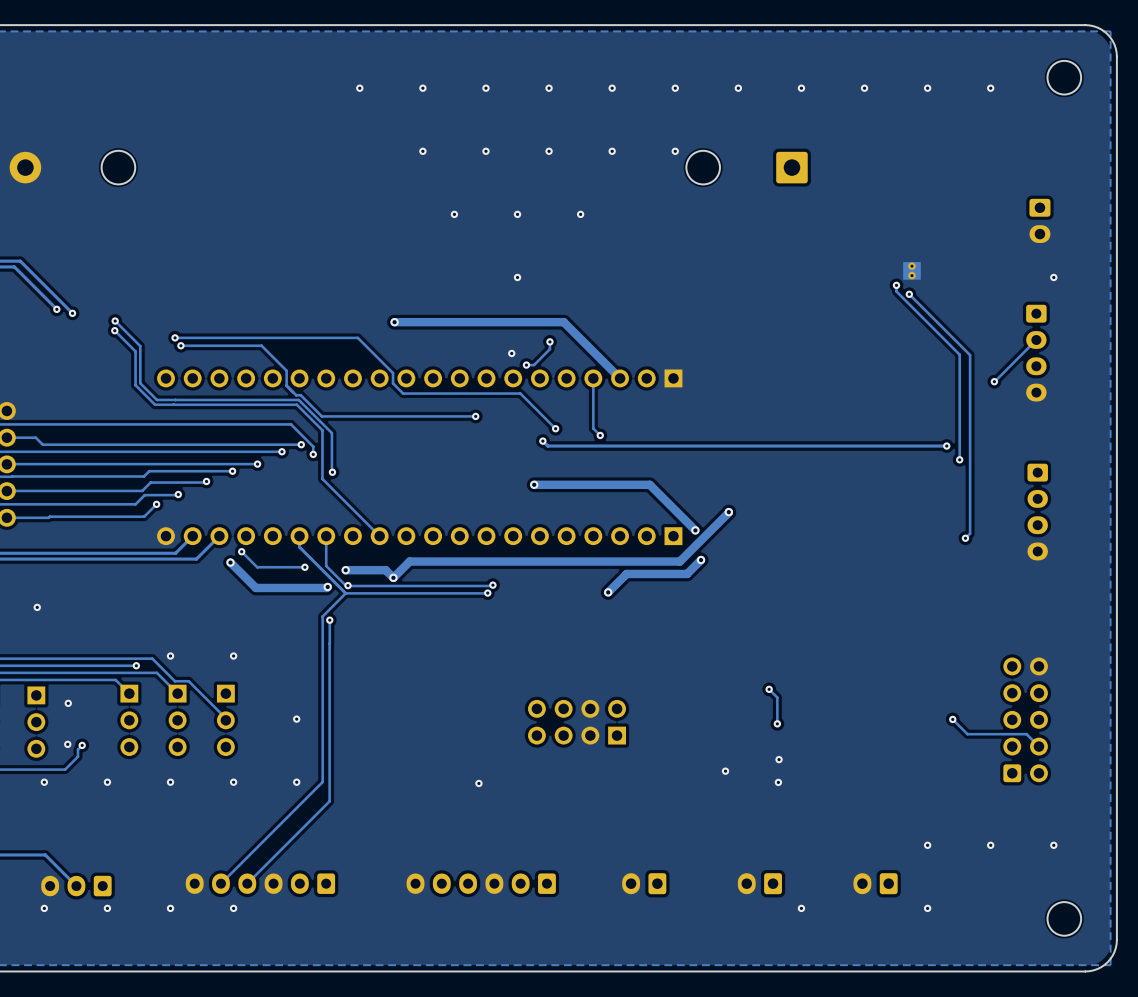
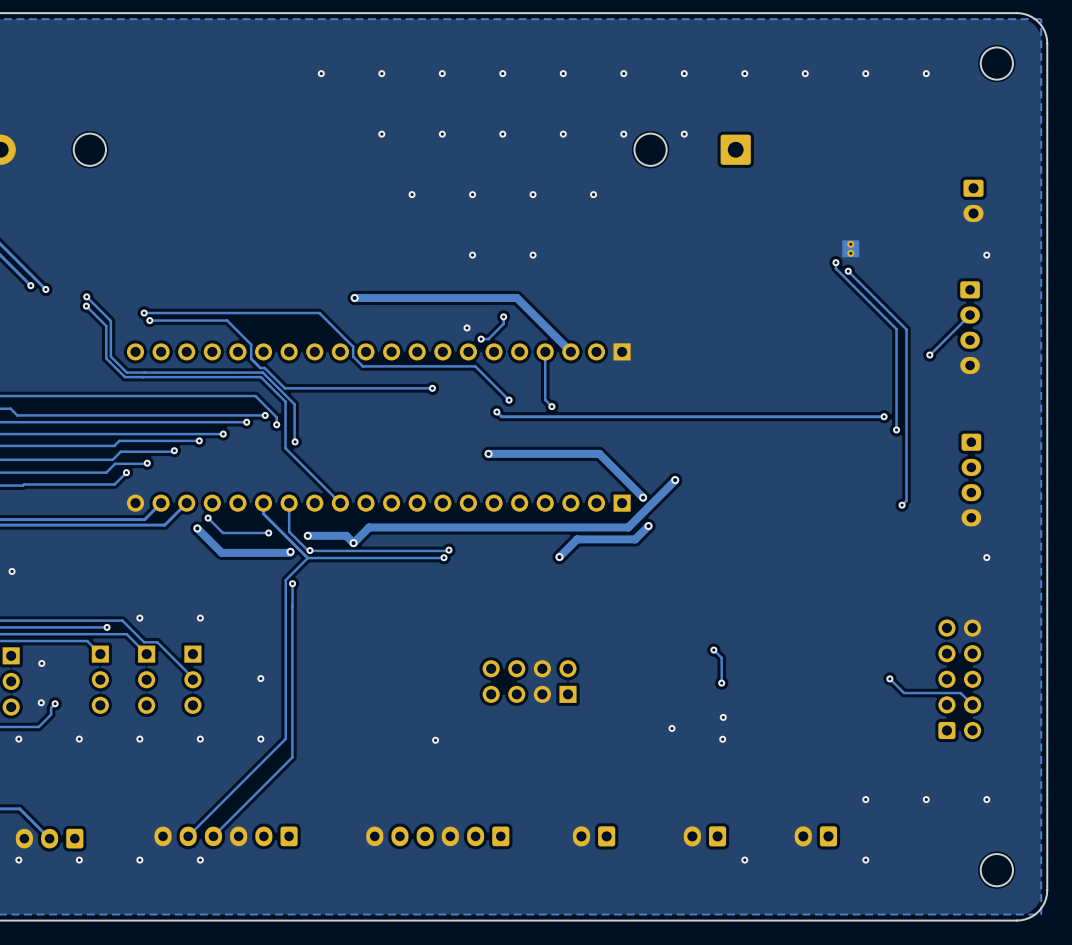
via: none -> (684, 134)
via: none -> (593, 194)
via: none -> (533, 255)
via: none -> (986, 557)

